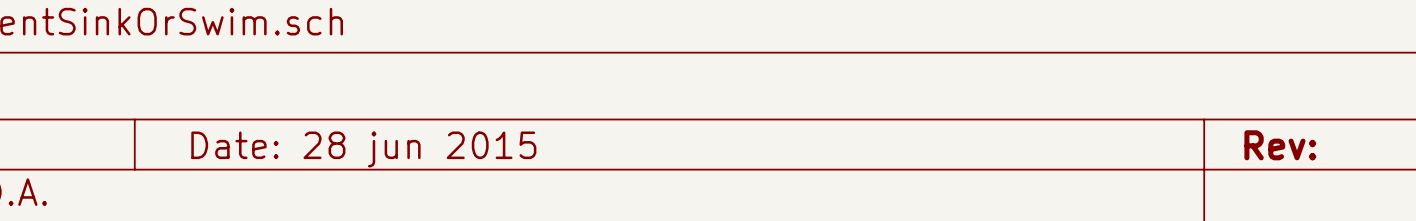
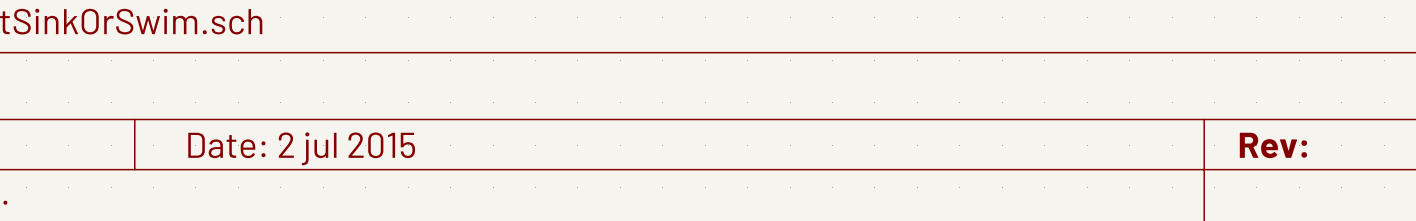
title block: Date: 28 jun 2015 (363, 149) -> Date: 2 jul 2015 (301, 148)

